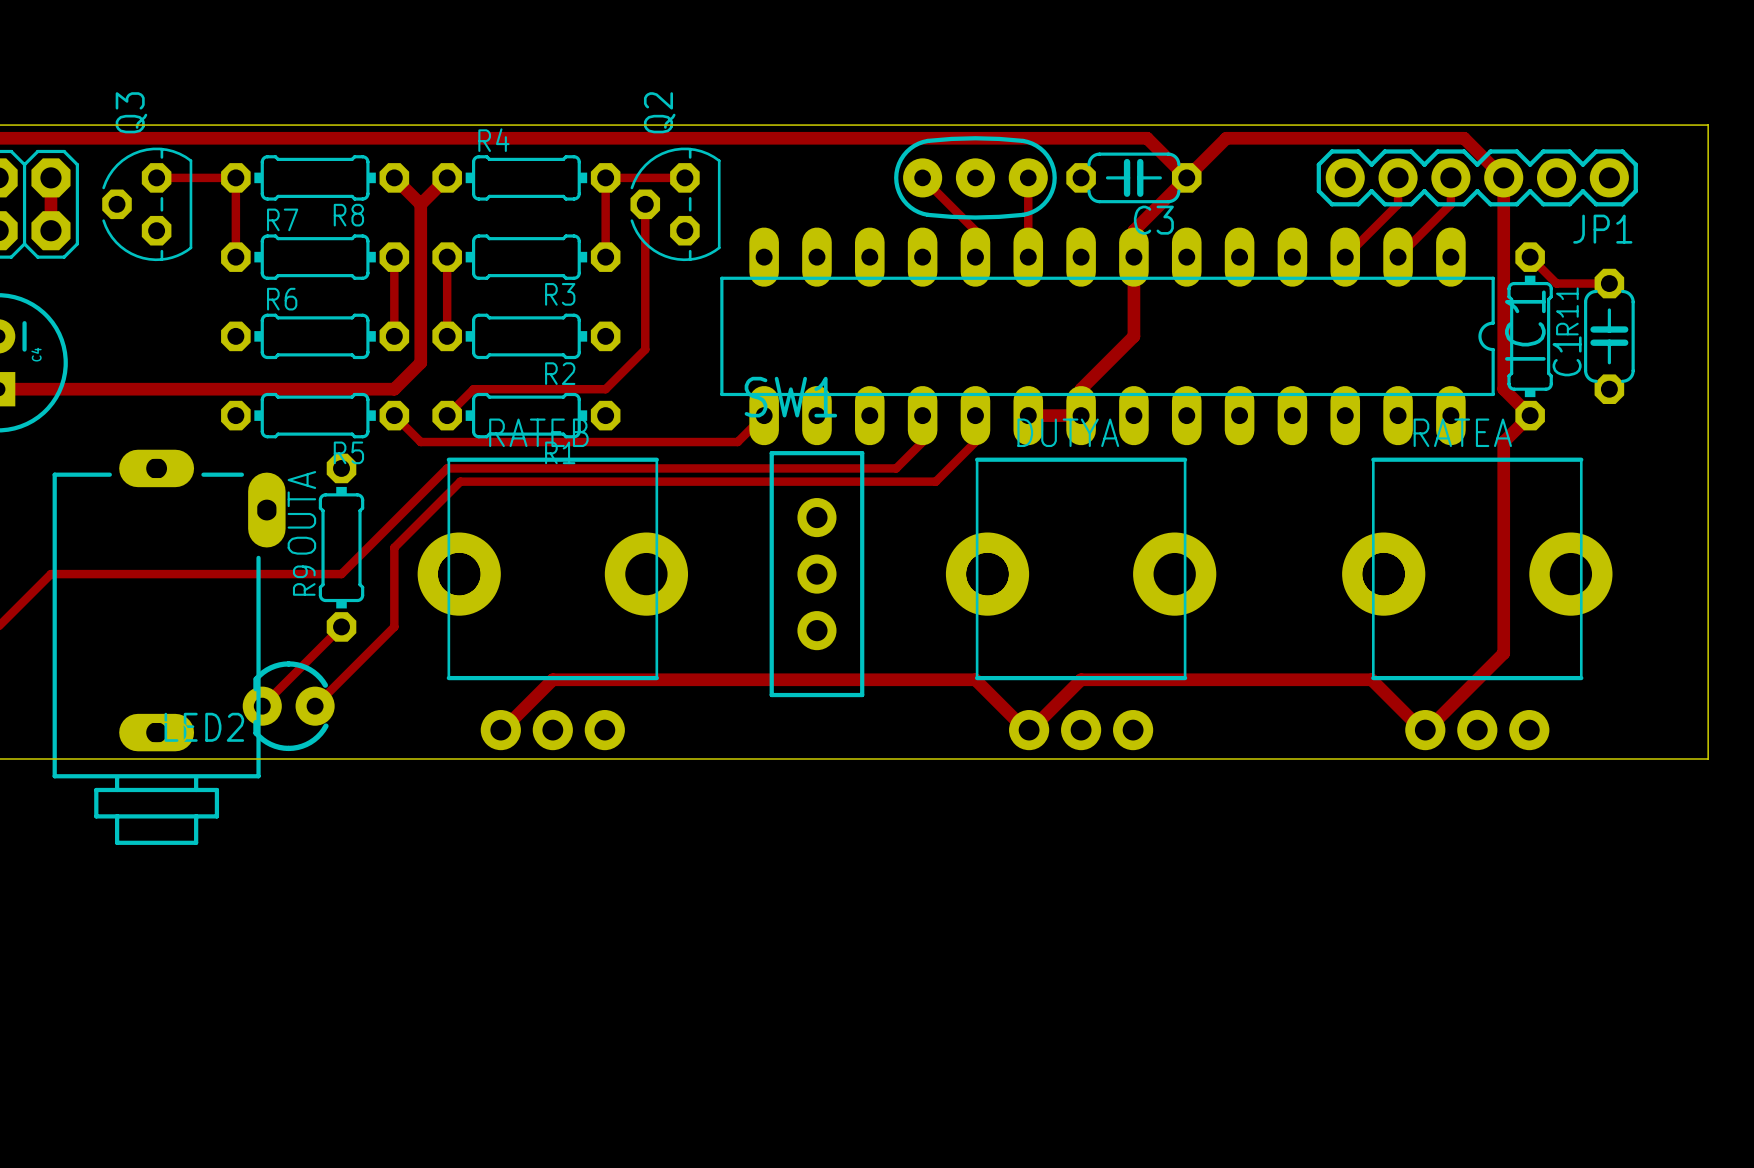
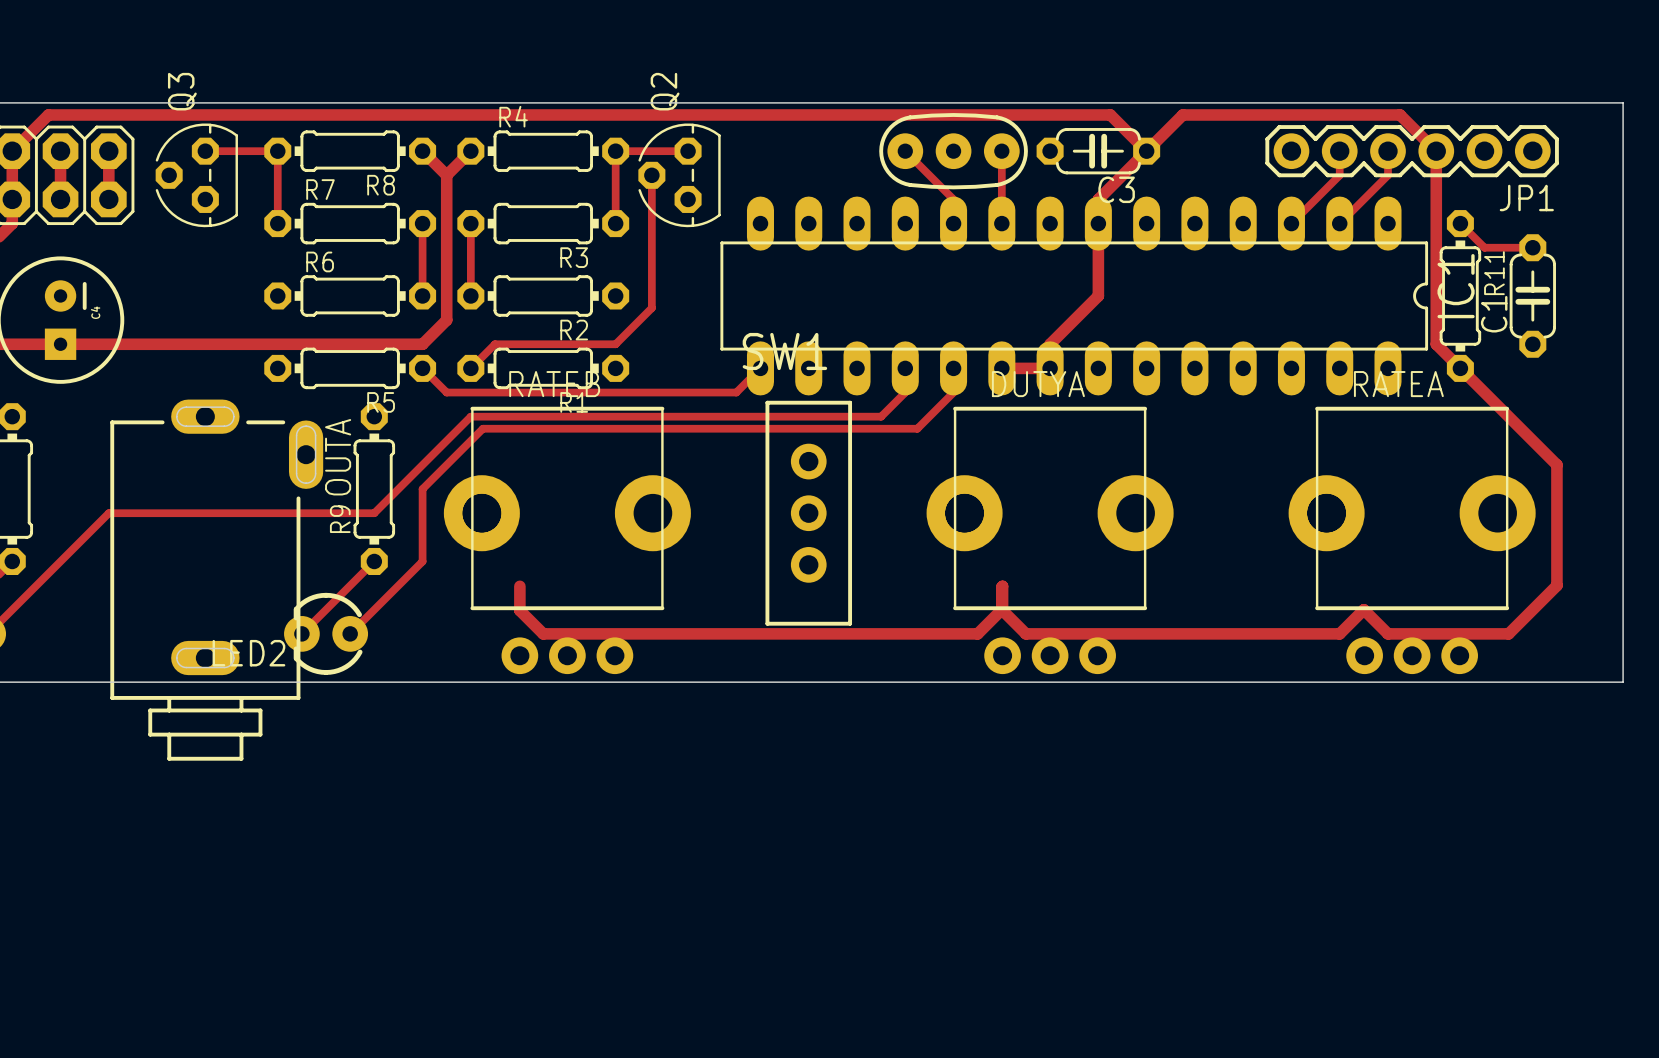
track: (1530, 415) (1503, 442) (1503, 653) (1424, 732) -> (1460, 368) (1556, 464) (1556, 585) (1508, 633) (1388, 633) (1363, 609) (1339, 633) (1025, 633) (1002, 610) (1002, 586) (1001, 609) (977, 633) (543, 633) (519, 610) (519, 586)
track: (500, 730) (500, 732) (552, 679) (975, 679) (1028, 732) -> none
track: (1028, 732) (1081, 679) (1371, 679) (1424, 732) -> none

